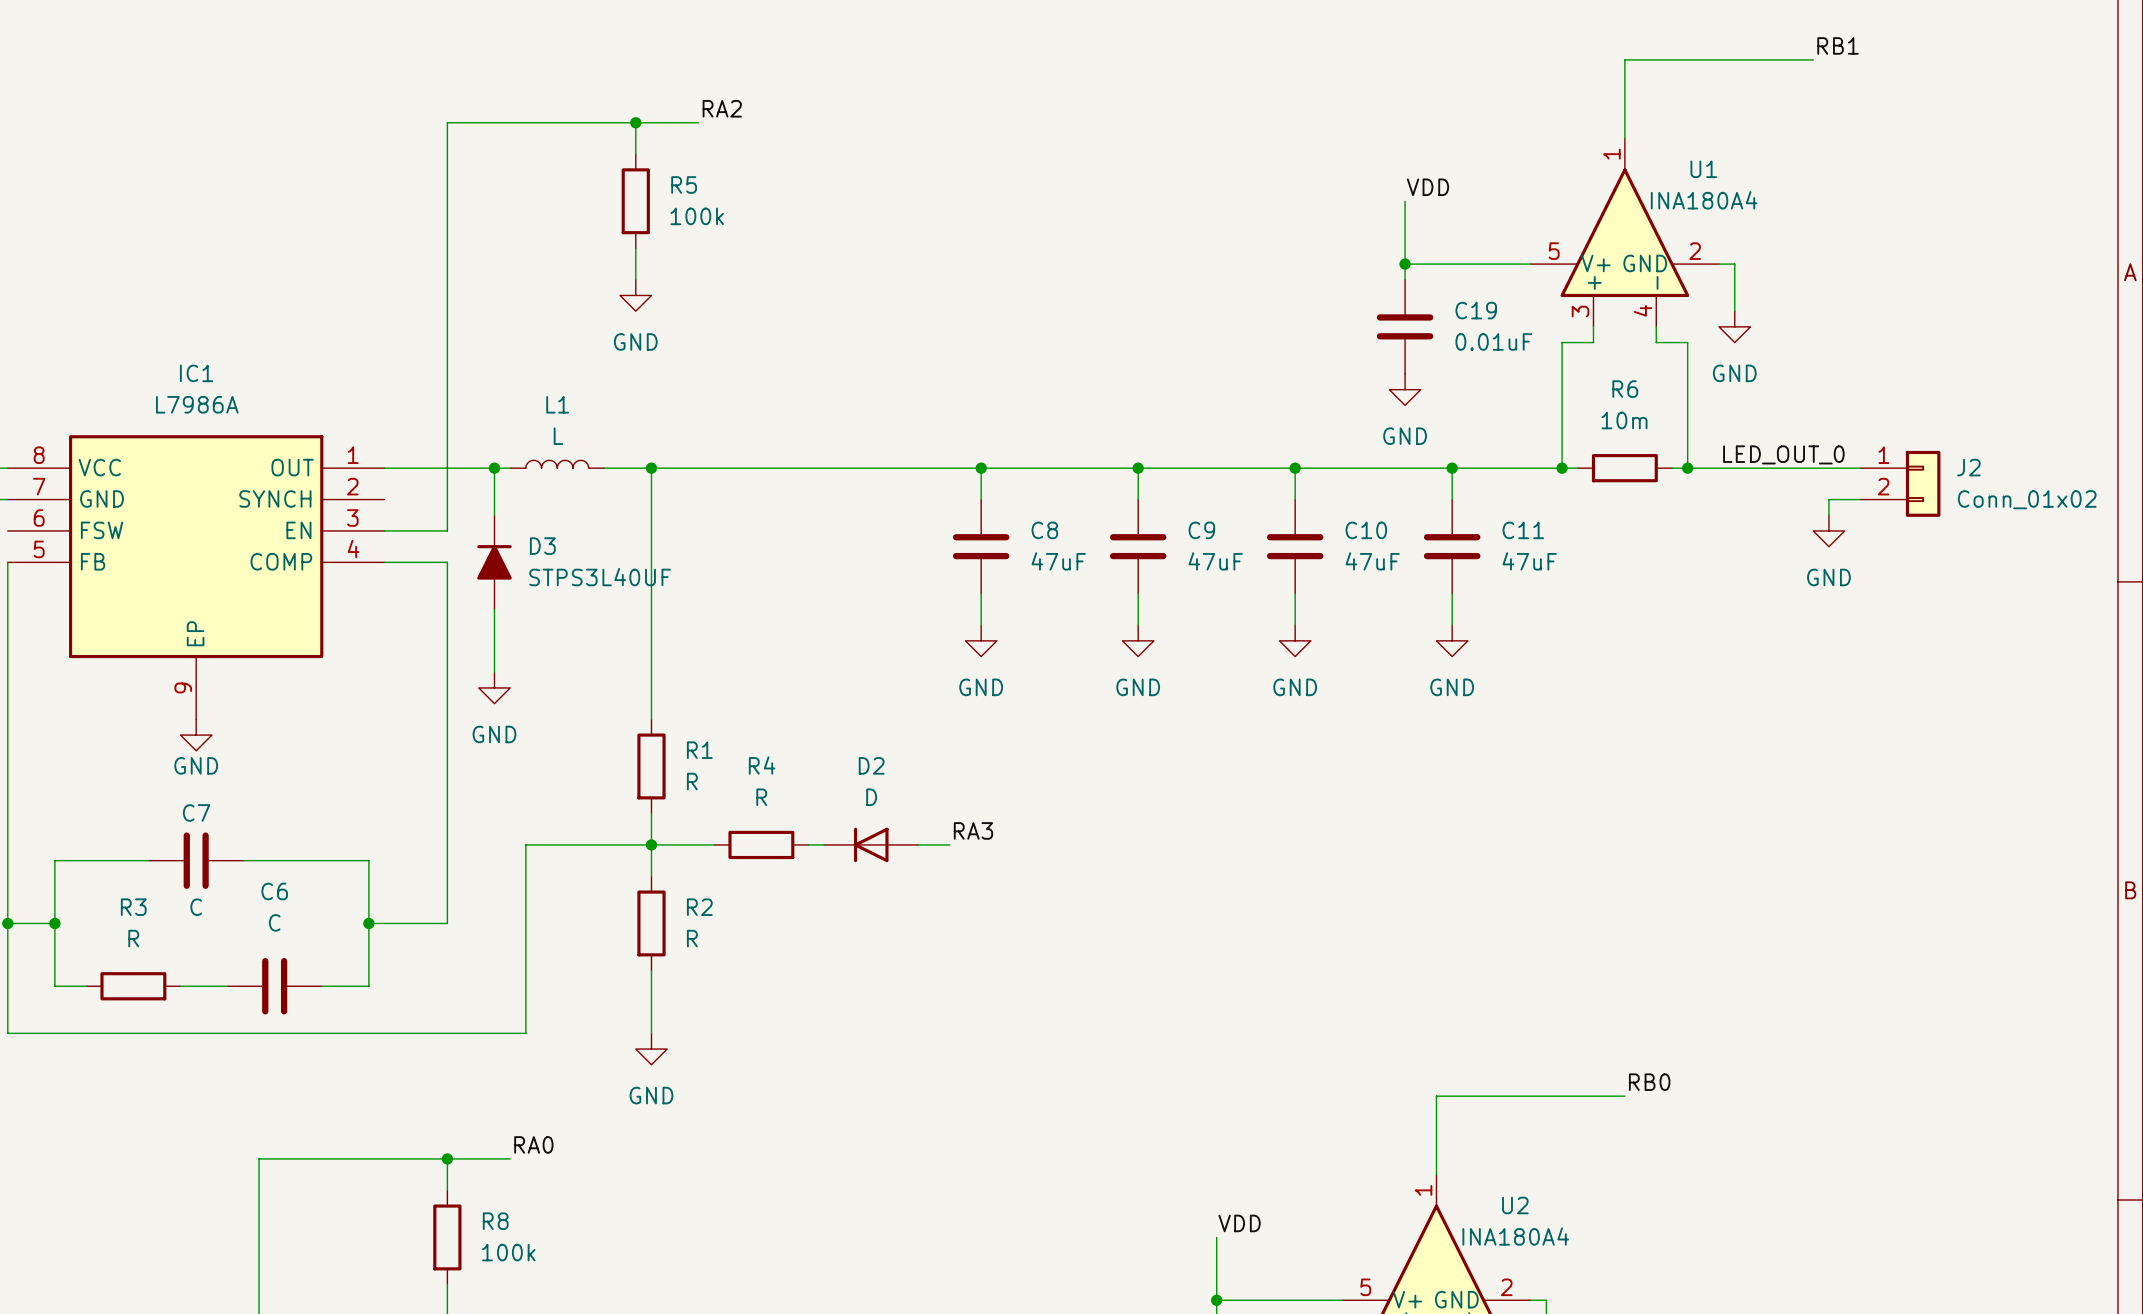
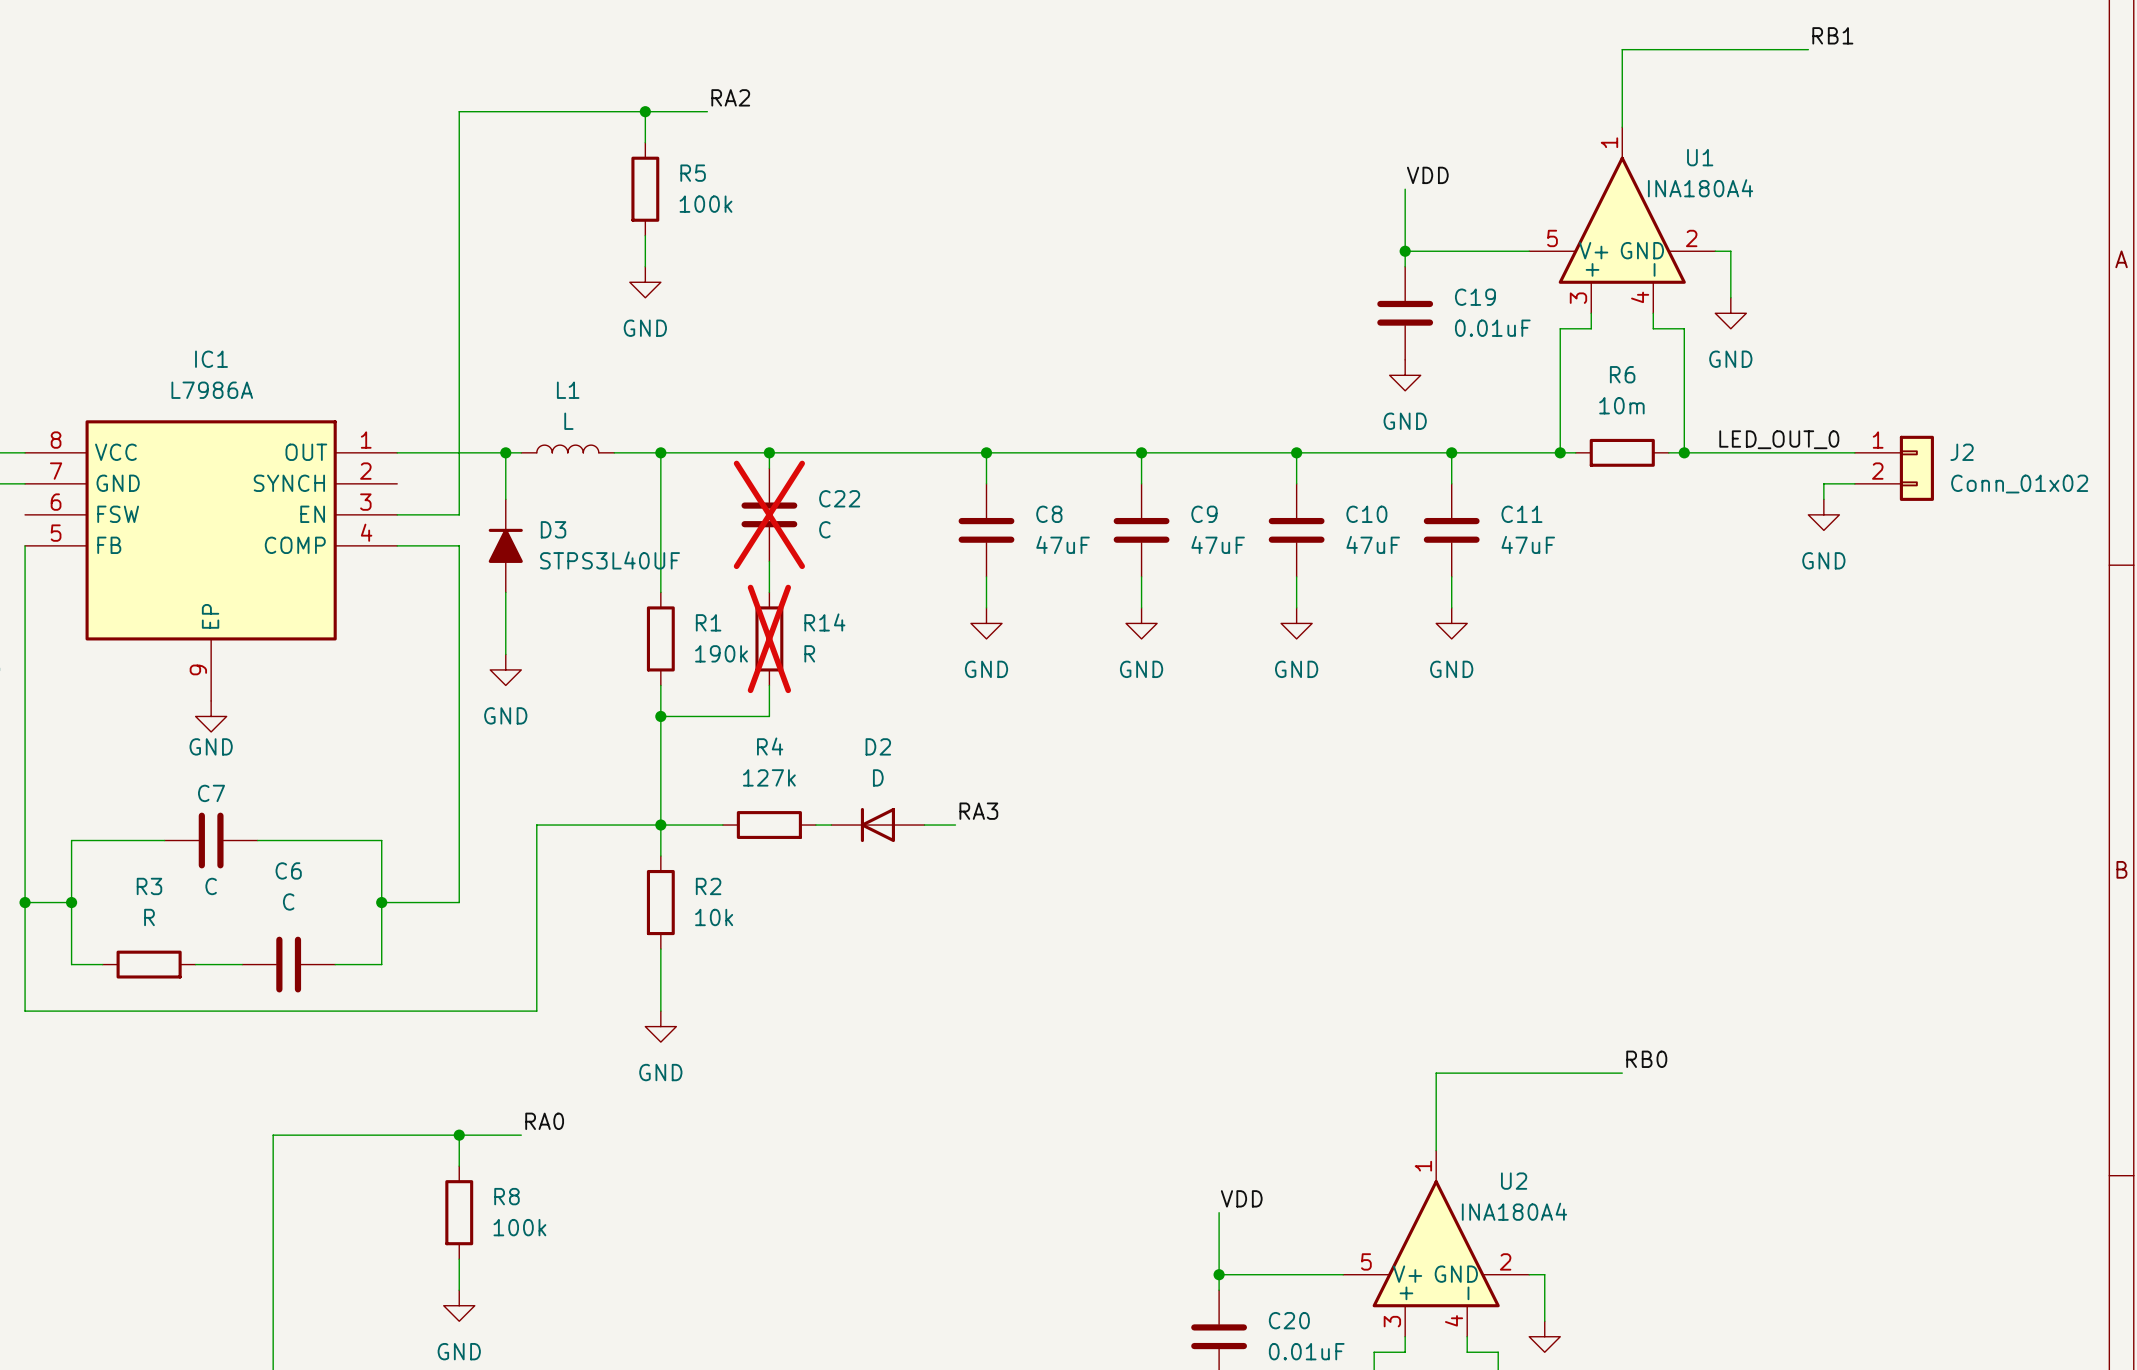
wire: none -> (769, 452) (769, 468)
junction: none -> (769, 452)
C22: none -> C (769, 514)
wire: none -> (769, 561) (769, 592)
wire: (651, 609) (651, 703) -> (660, 700) (660, 794)
R14: none -> R (769, 638)
wire: none -> (769, 685) (769, 716) (660, 716)
junction: none -> (660, 716)
R1 position: (651, 766) -> (660, 638)
R1 value: R (692, 781) -> 190k (721, 653)
R4 value: R (761, 797) -> 127k (769, 777)
R2 value: R (692, 938) -> 10k (714, 917)

